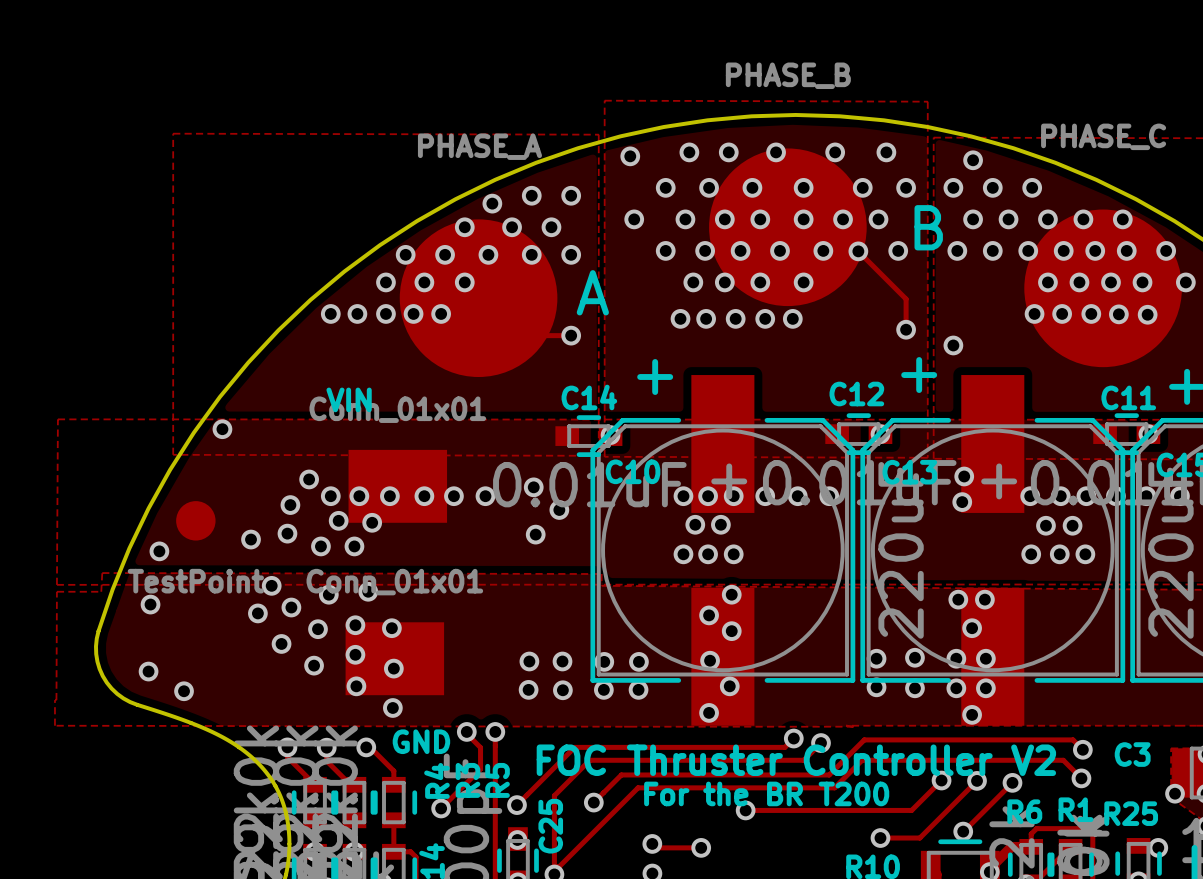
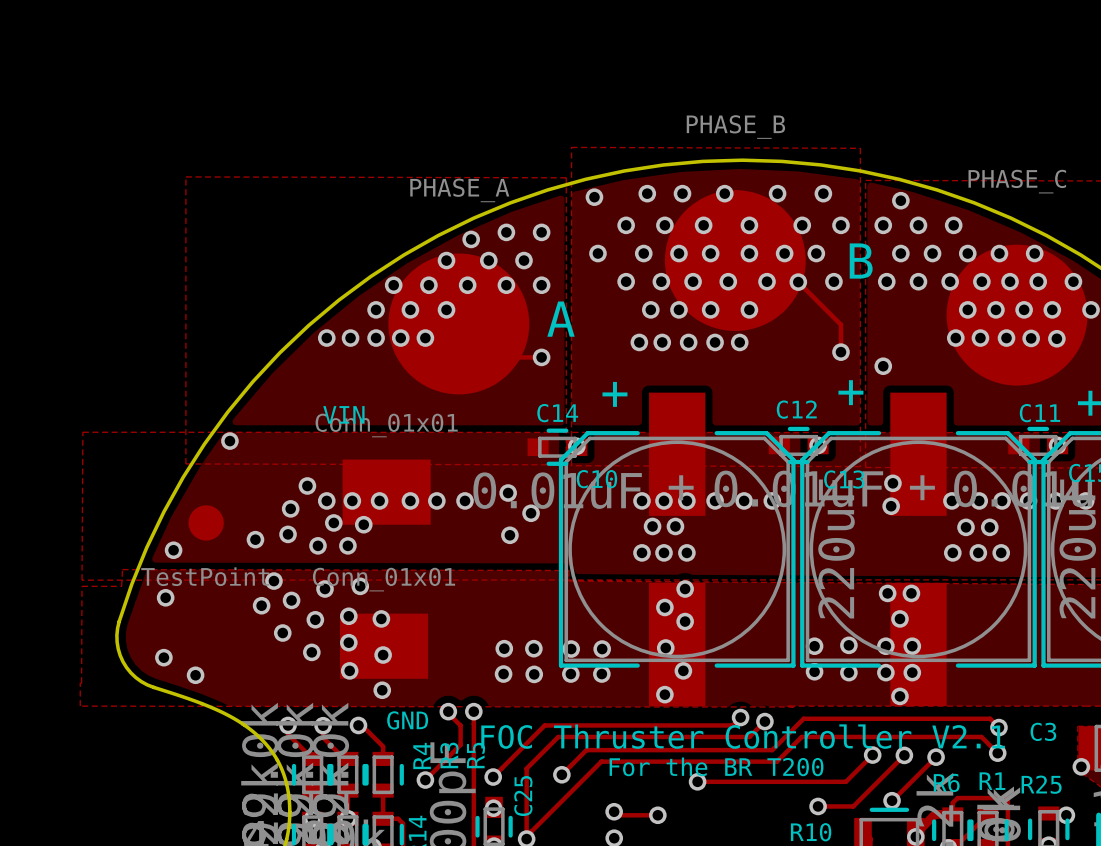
text: FOC Thruster Controller V2 (796, 760) -> FOC Thruster Controller V2.1 (743, 736)

